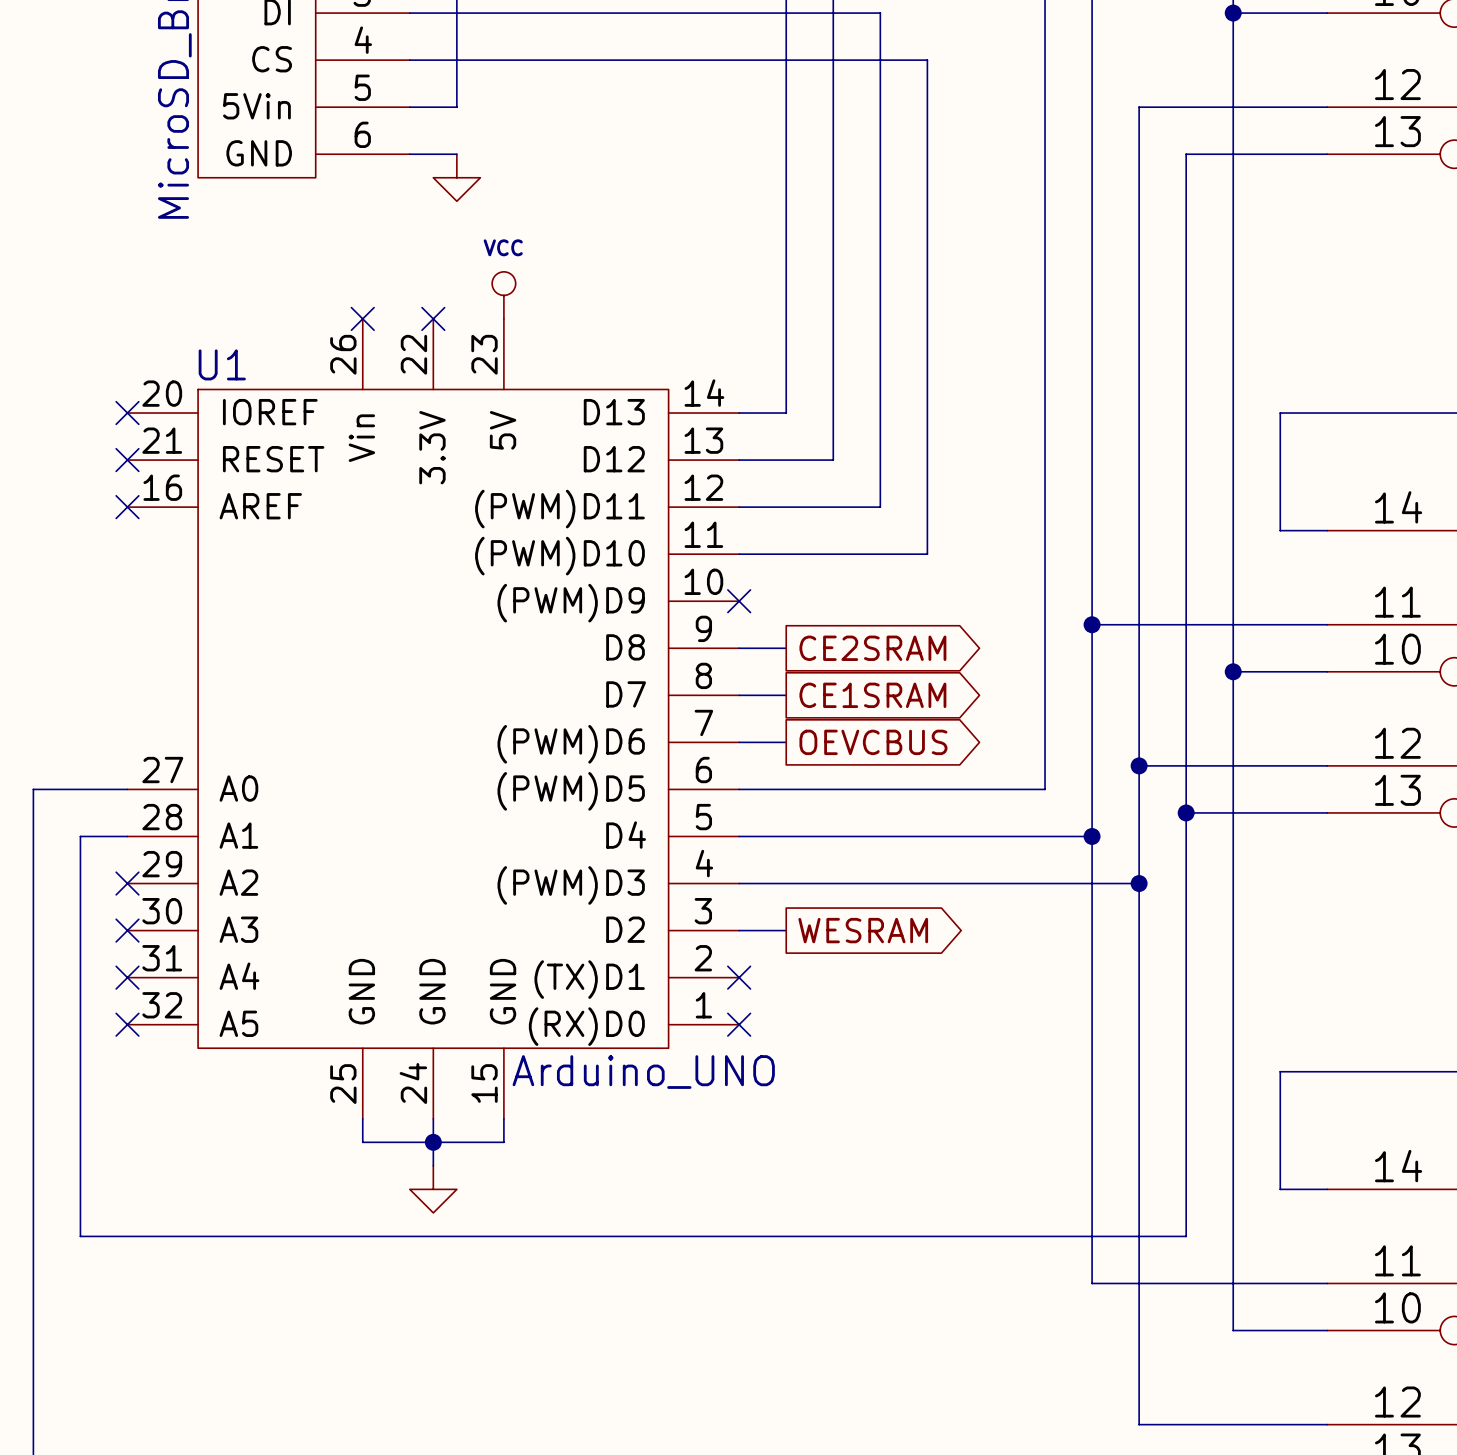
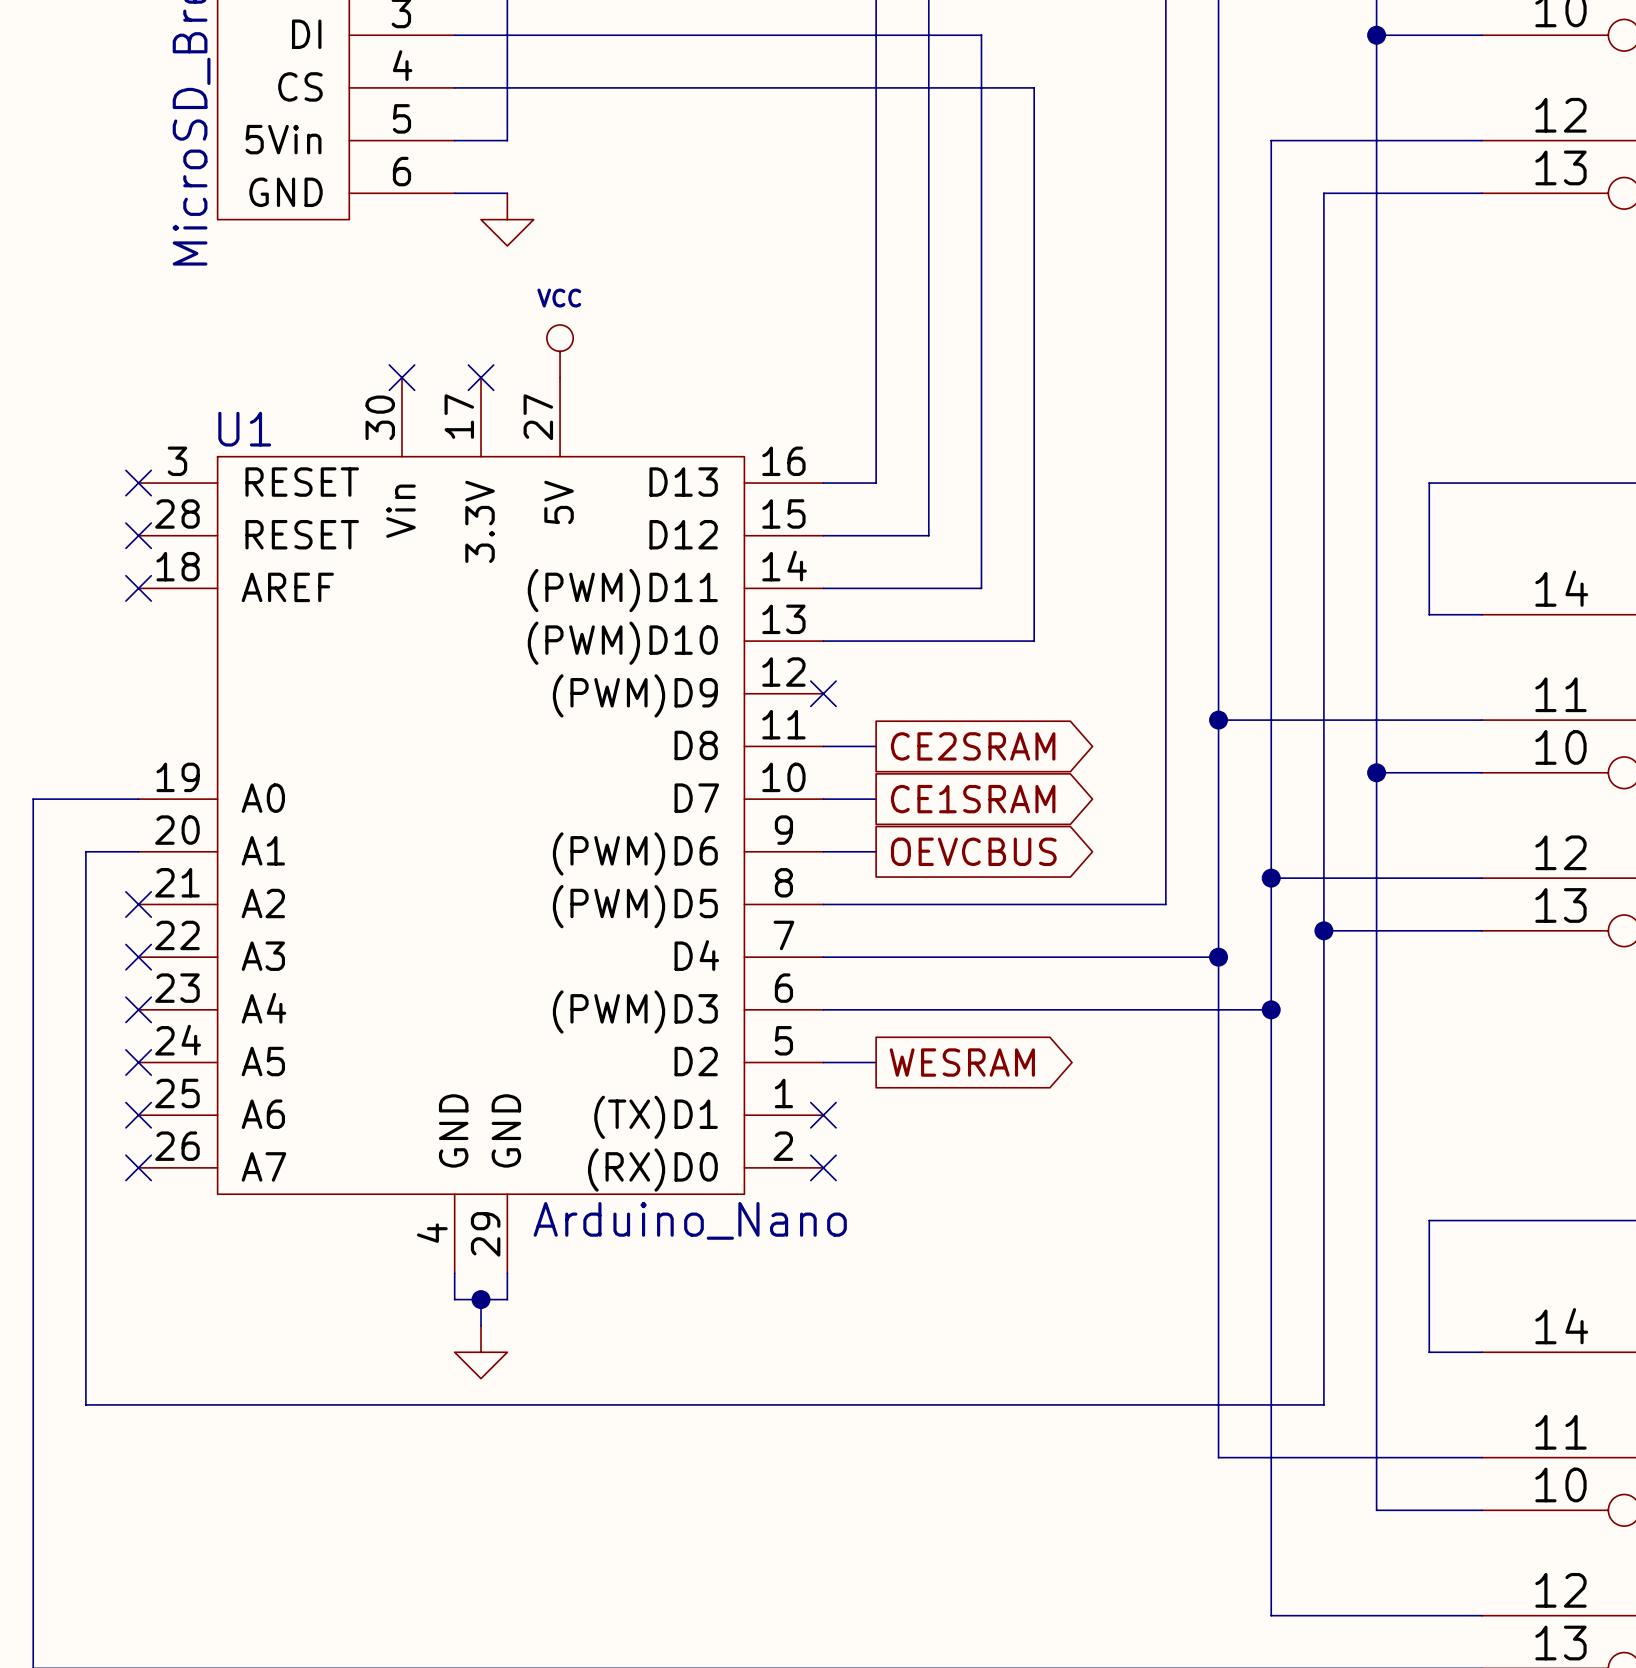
U1 symbol: [127, 318, 740, 1119] -> [138, 377, 824, 1274]
wire: (33, 789) (127, 789) -> (33, 904) (33, 799) (138, 799)
no-connect mark: none -> (138, 904)
wire: (80, 836) (127, 836) -> (85, 957) (85, 851) (138, 851)
no-connect mark: none -> (138, 957)
U1 value: Arduino_UNO (643, 1072) -> Arduino_Nano (690, 1220)
wire: (362, 1118) (362, 1142) (409, 1142) -> (454, 1273) (454, 1299)
wire: (433, 1118) (433, 1142) -> none
wire: (503, 1118) (503, 1142) (456, 1142) -> (507, 1273) (507, 1299)

